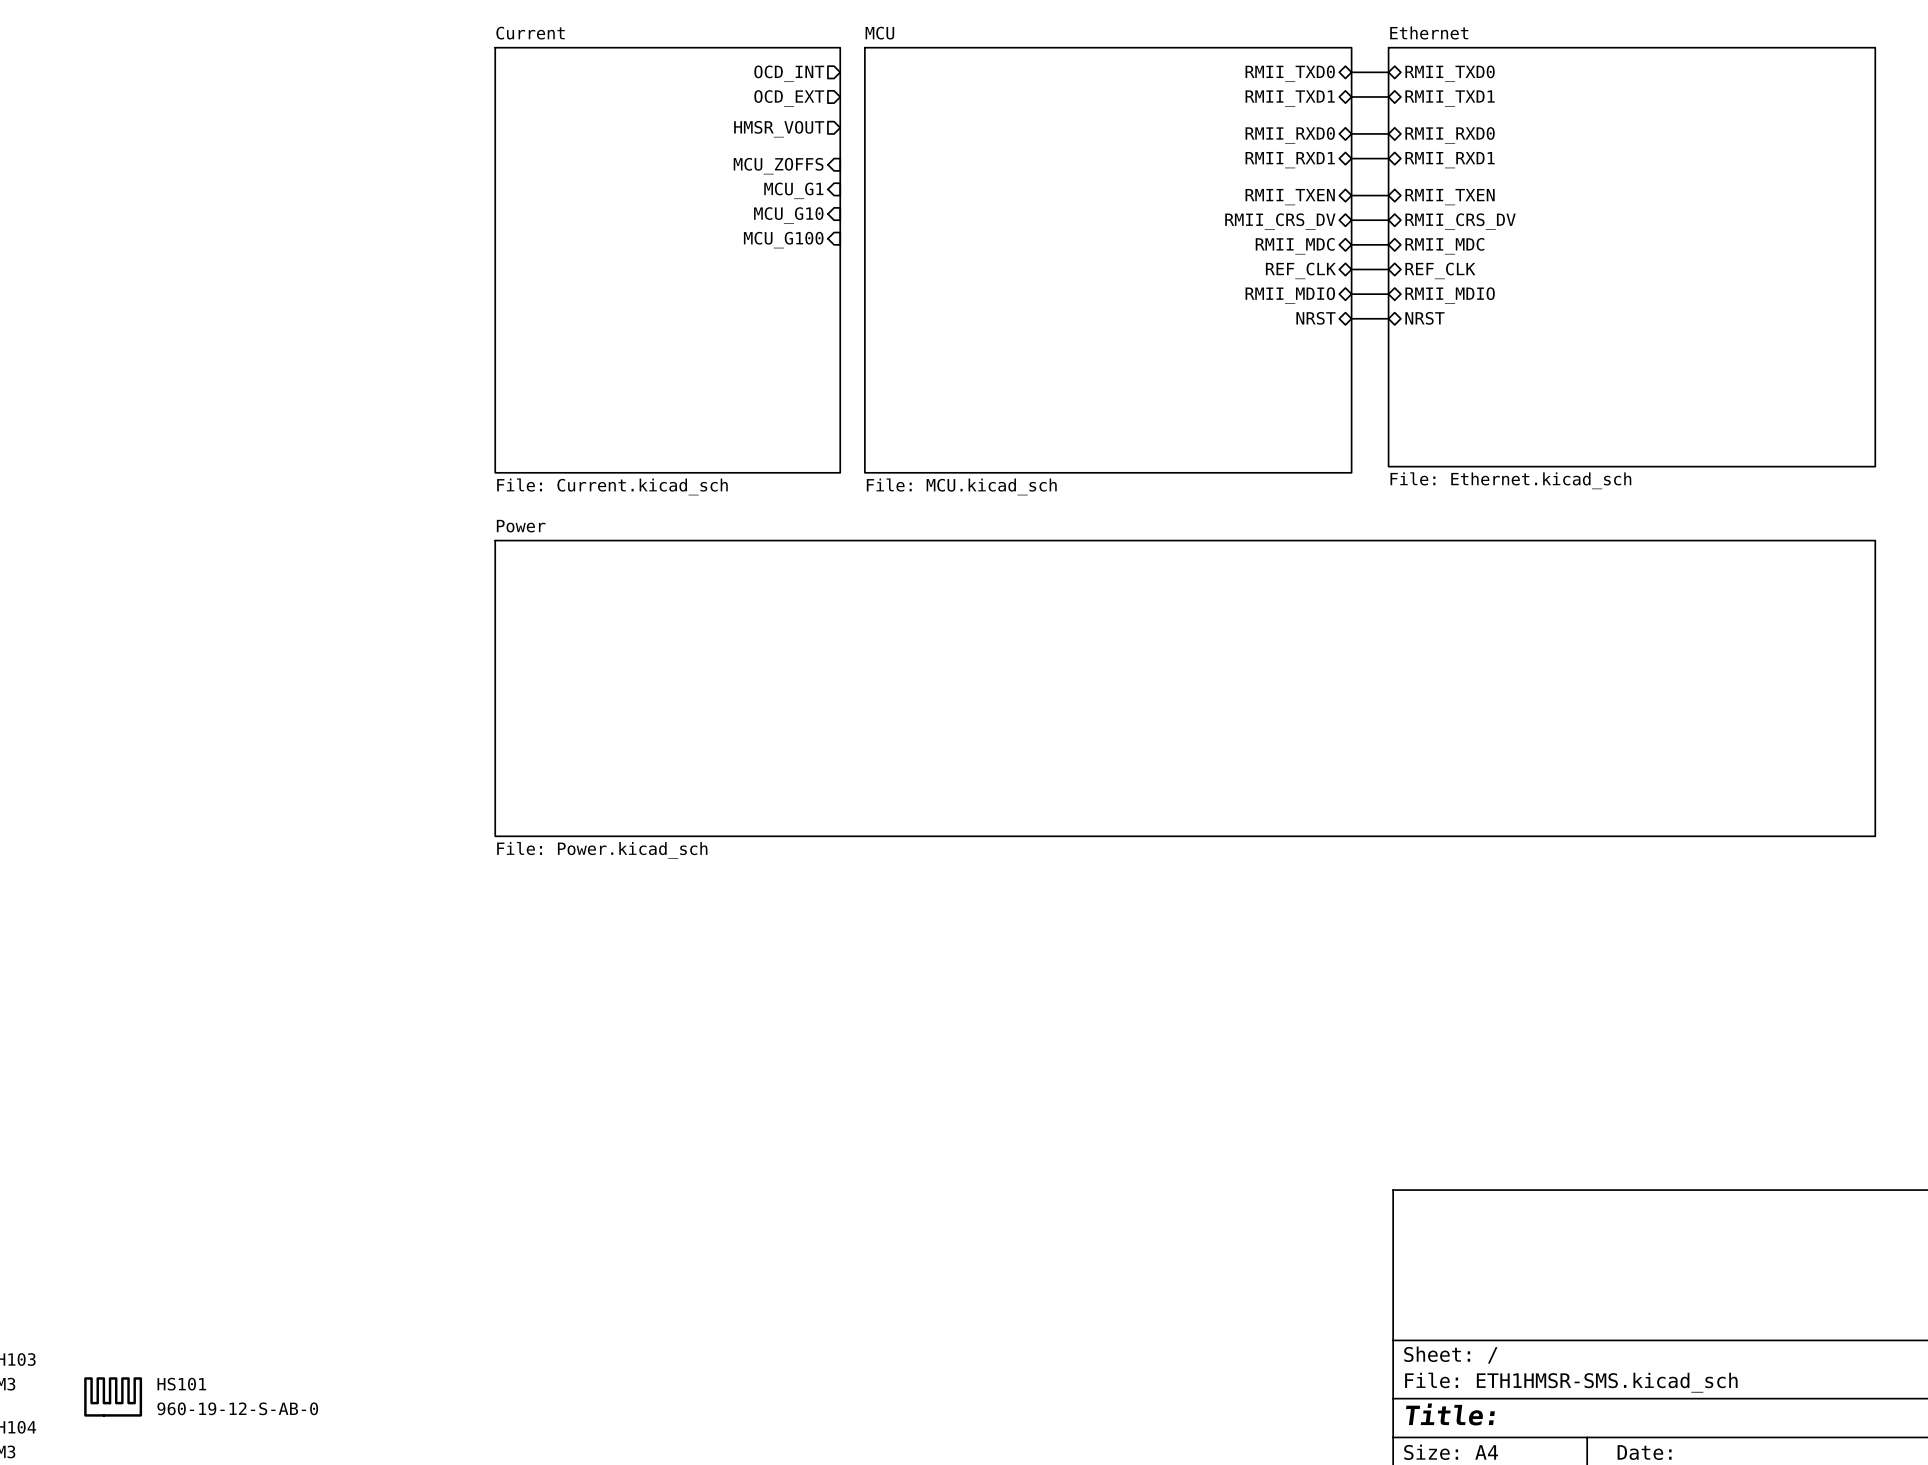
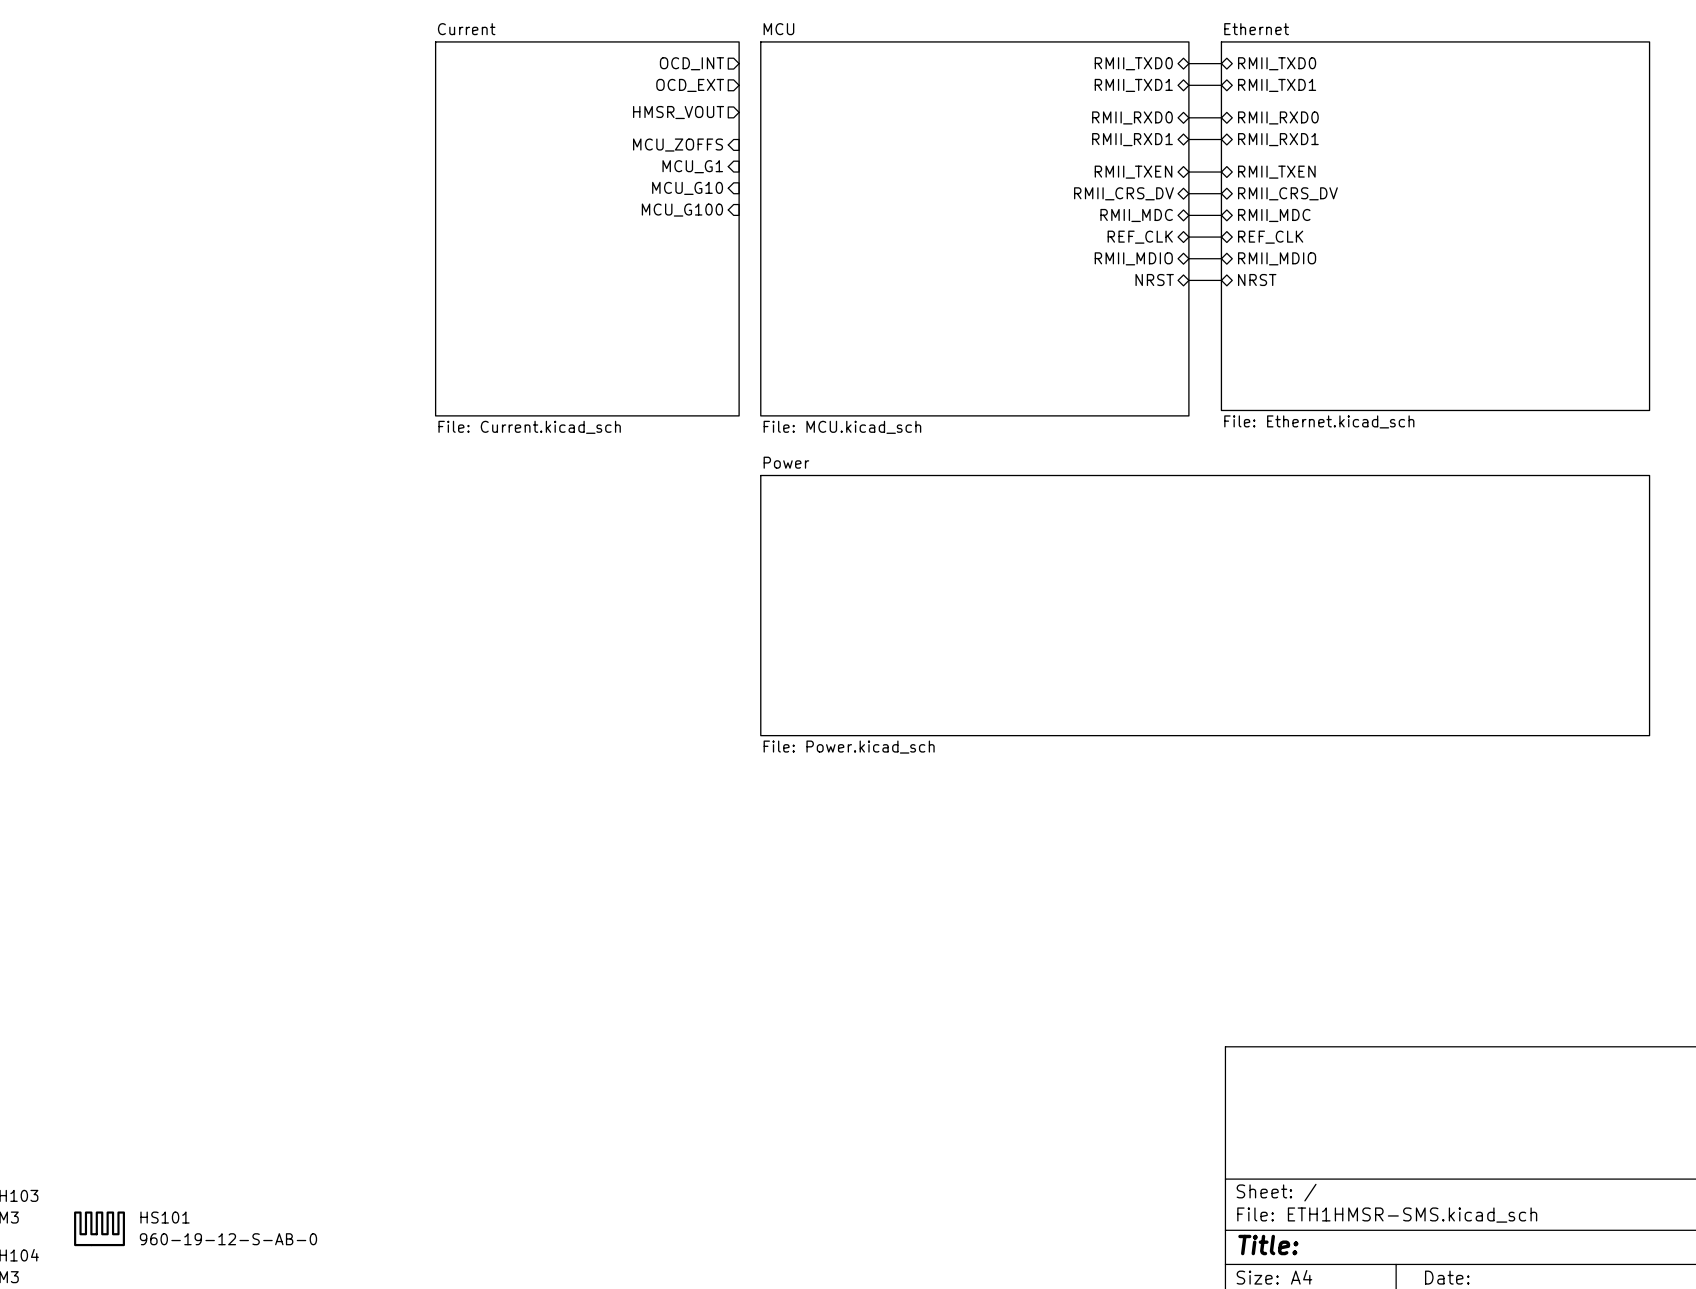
sheet Power: File: Power.kicad_sch (1185, 688) -> none
sheet Power: none -> File: Power.kicad_sch (1205, 605)

